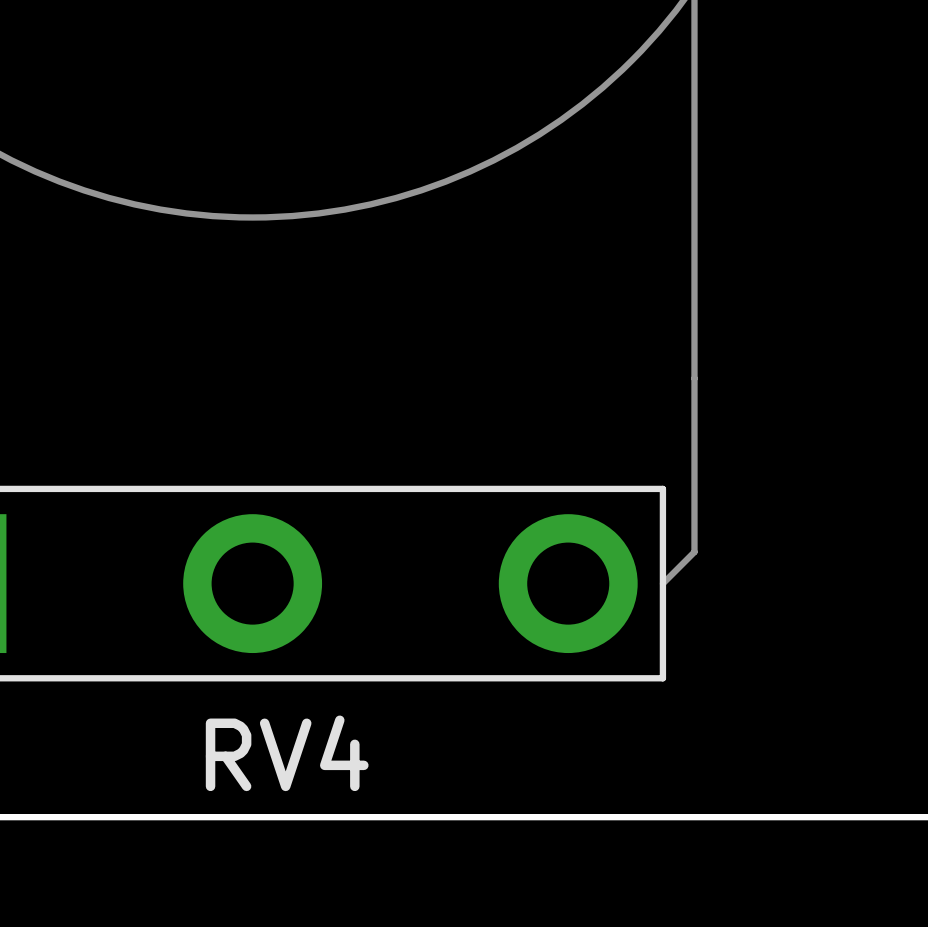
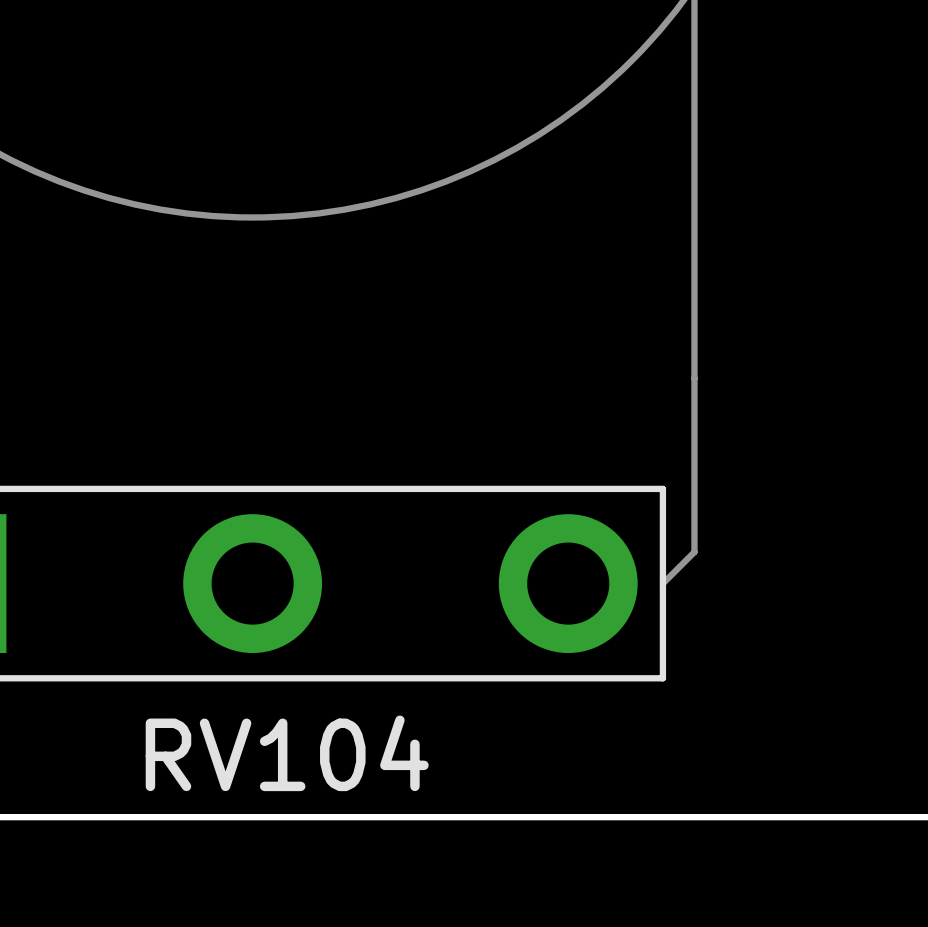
RV4 name: RV4 (287, 753) -> RV104 (287, 753)

